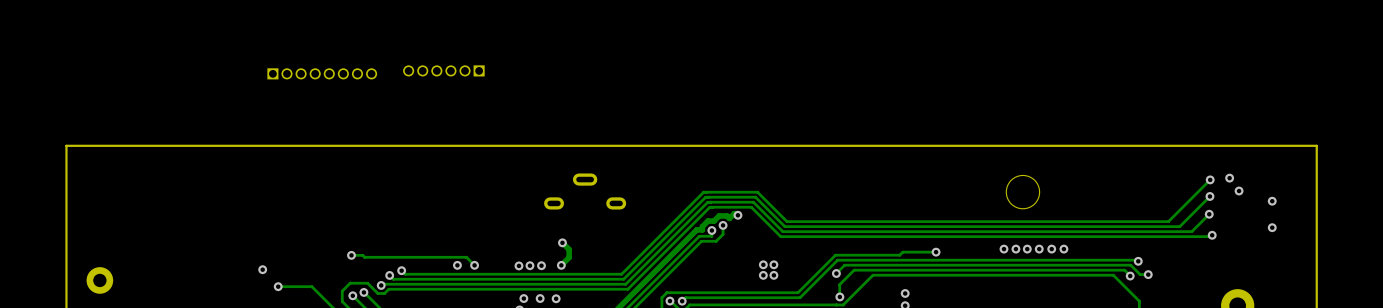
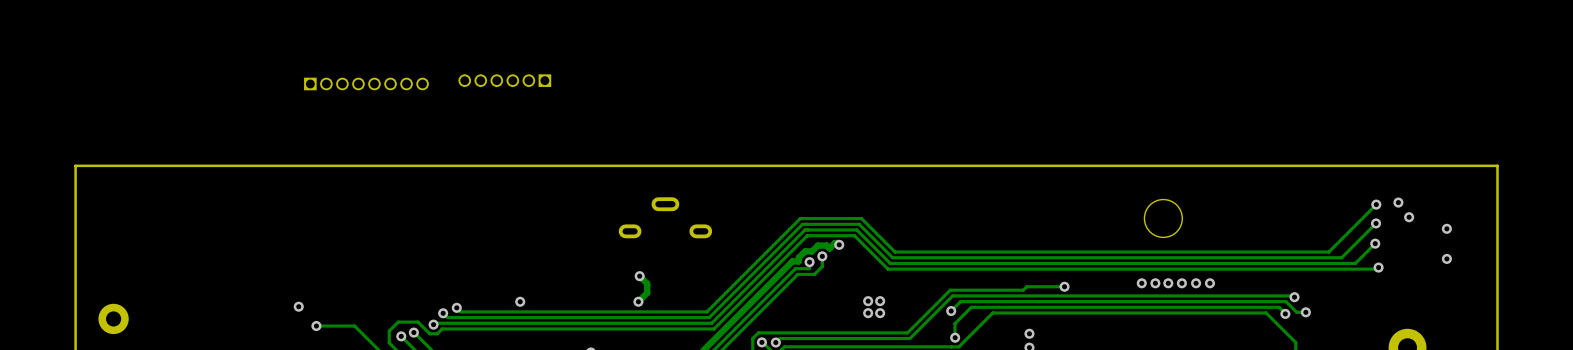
track: (351, 255) (362, 255) (364, 257) (466, 257) (474, 265) -> none
via: (351, 255) -> none
via: (474, 265) -> none
via: (518, 265) -> none
via: (529, 265) -> none
via: (541, 265) -> none
via: (523, 298) -> none
via: (540, 298) -> none
via: (556, 298) -> none

